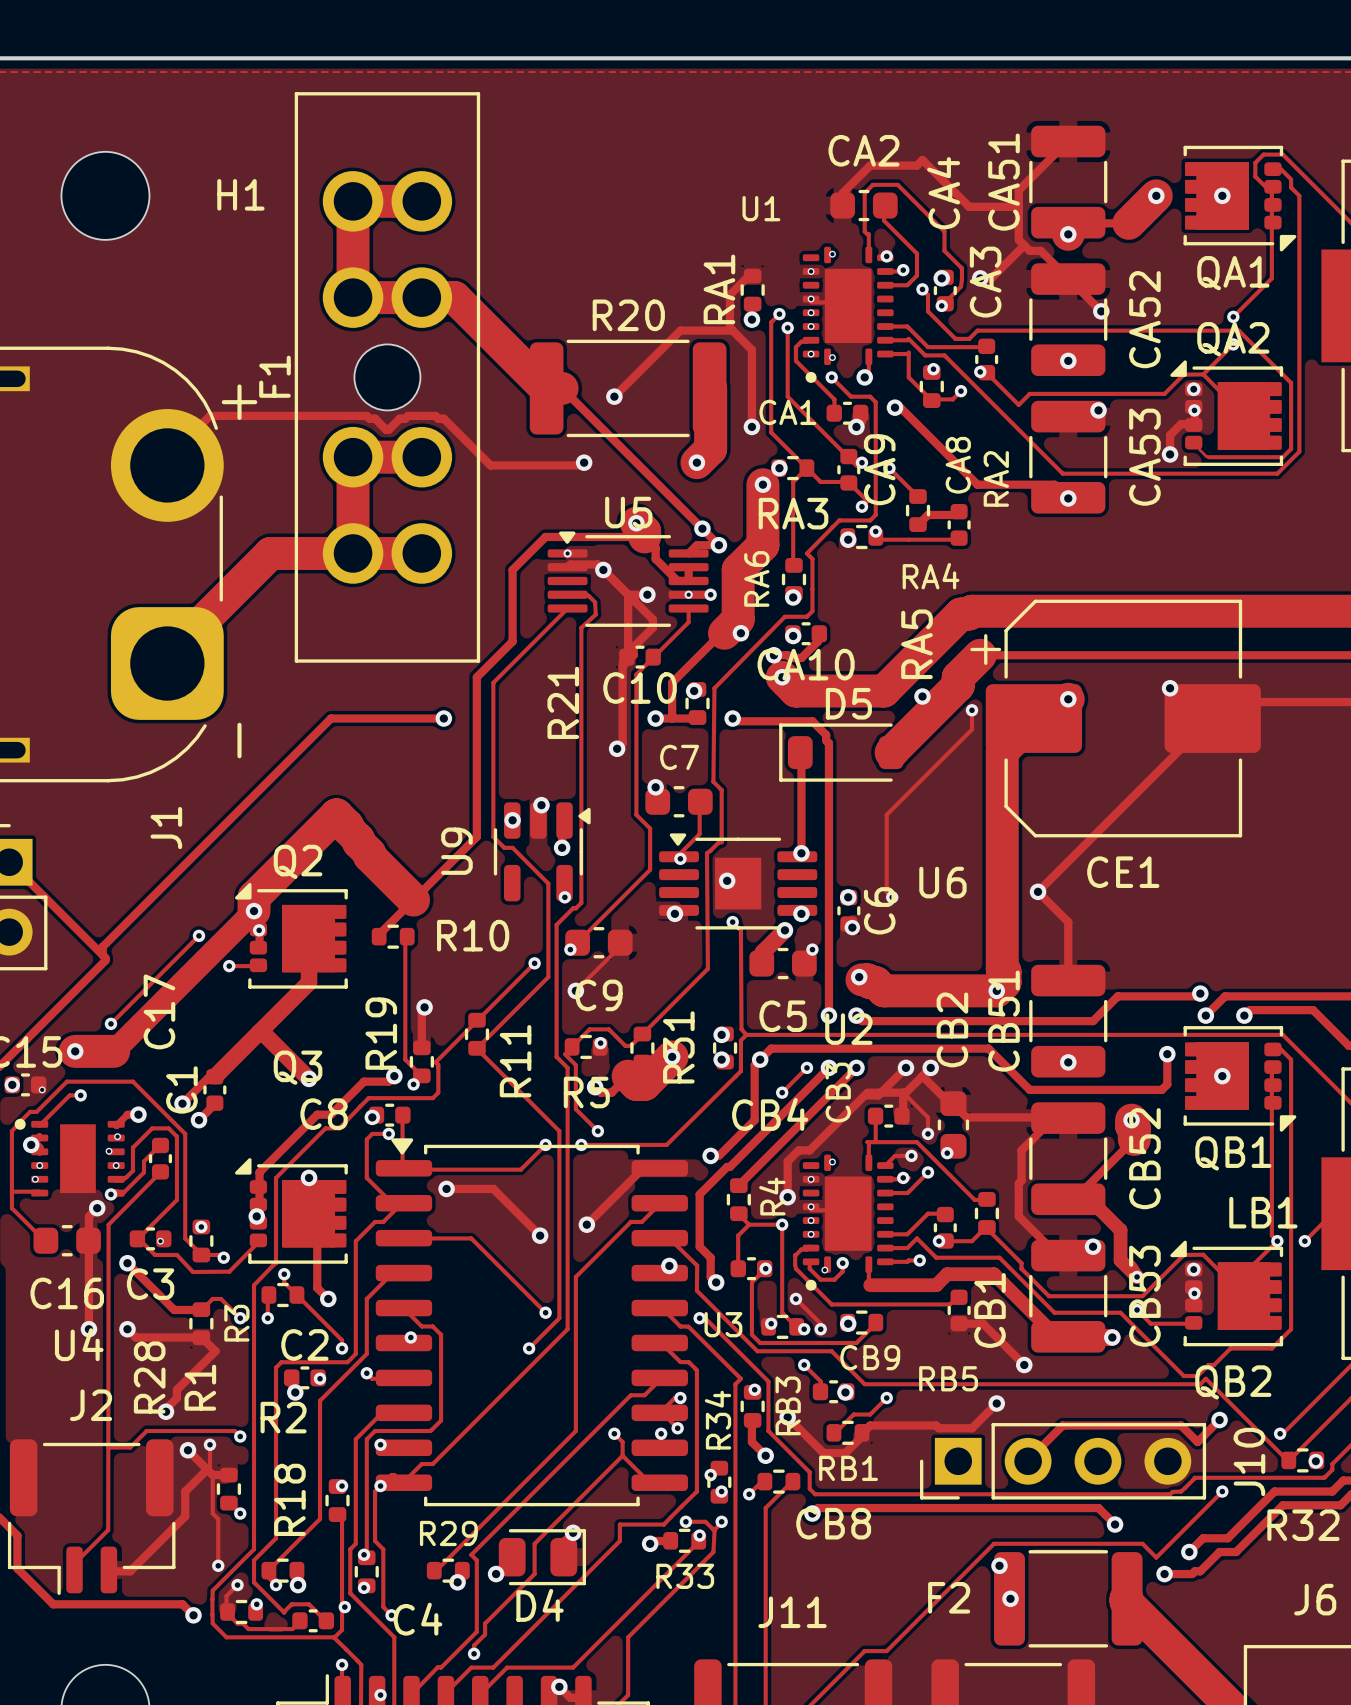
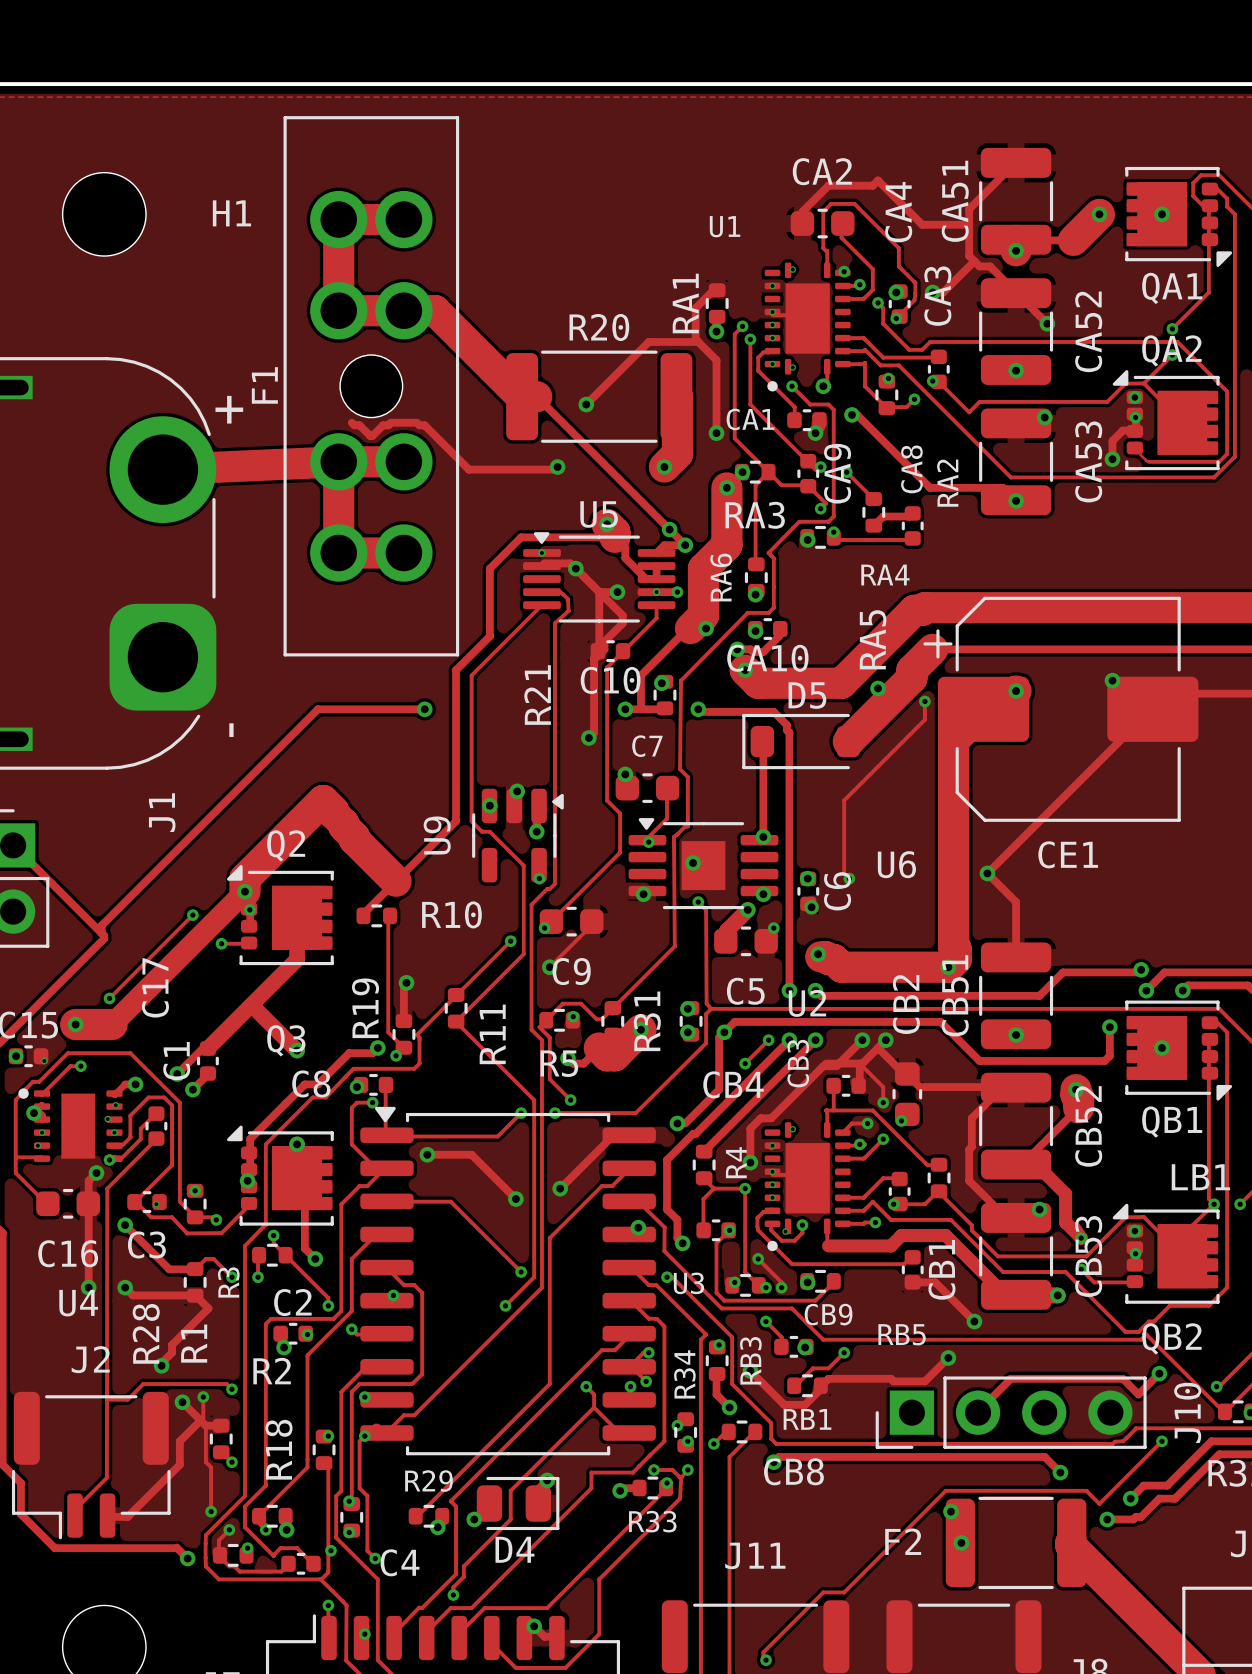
track: (366, 415) (210, 415) (160, 465) -> none
track: none -> (338, 461) (162, 469)
track: (353, 553) (270, 553) (160, 663) -> none

